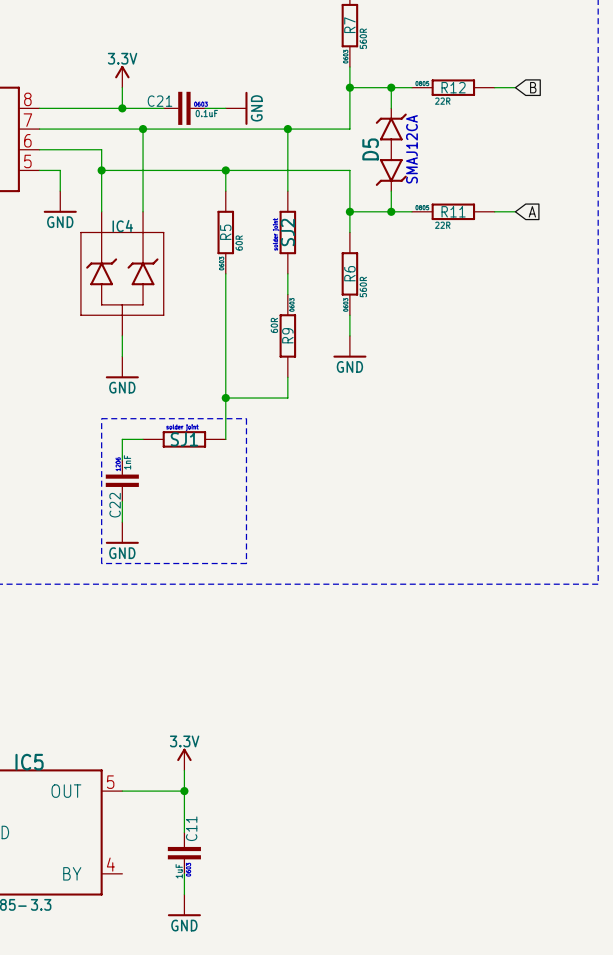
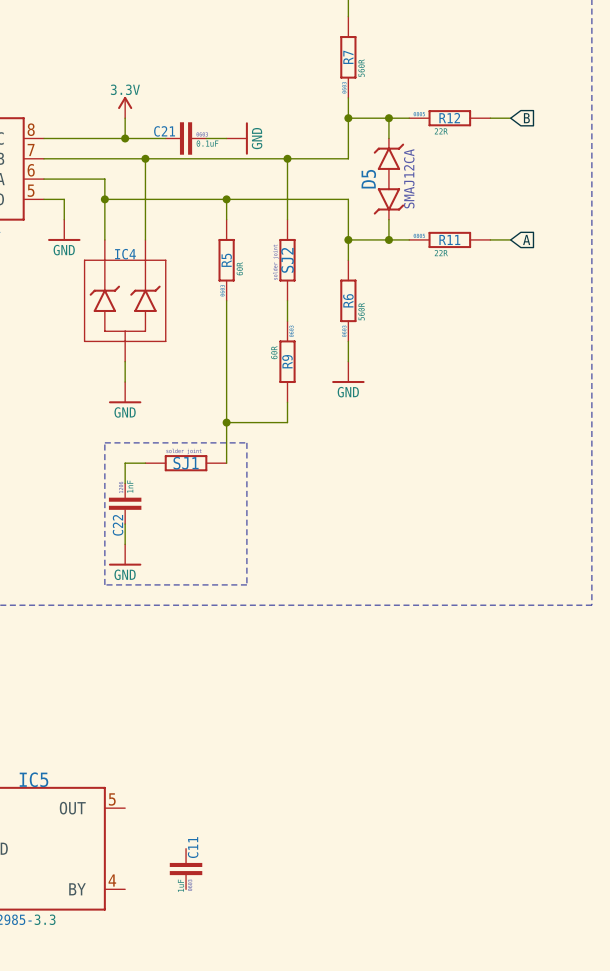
power symbol: 3.3V (184, 759) -> none
wire: (184, 770) (184, 832) -> none
wire: (122, 791) (184, 791) -> none
junction: (184, 791) -> none
wire: (184, 873) (184, 894) -> none
power symbol: GND (184, 905) -> none

